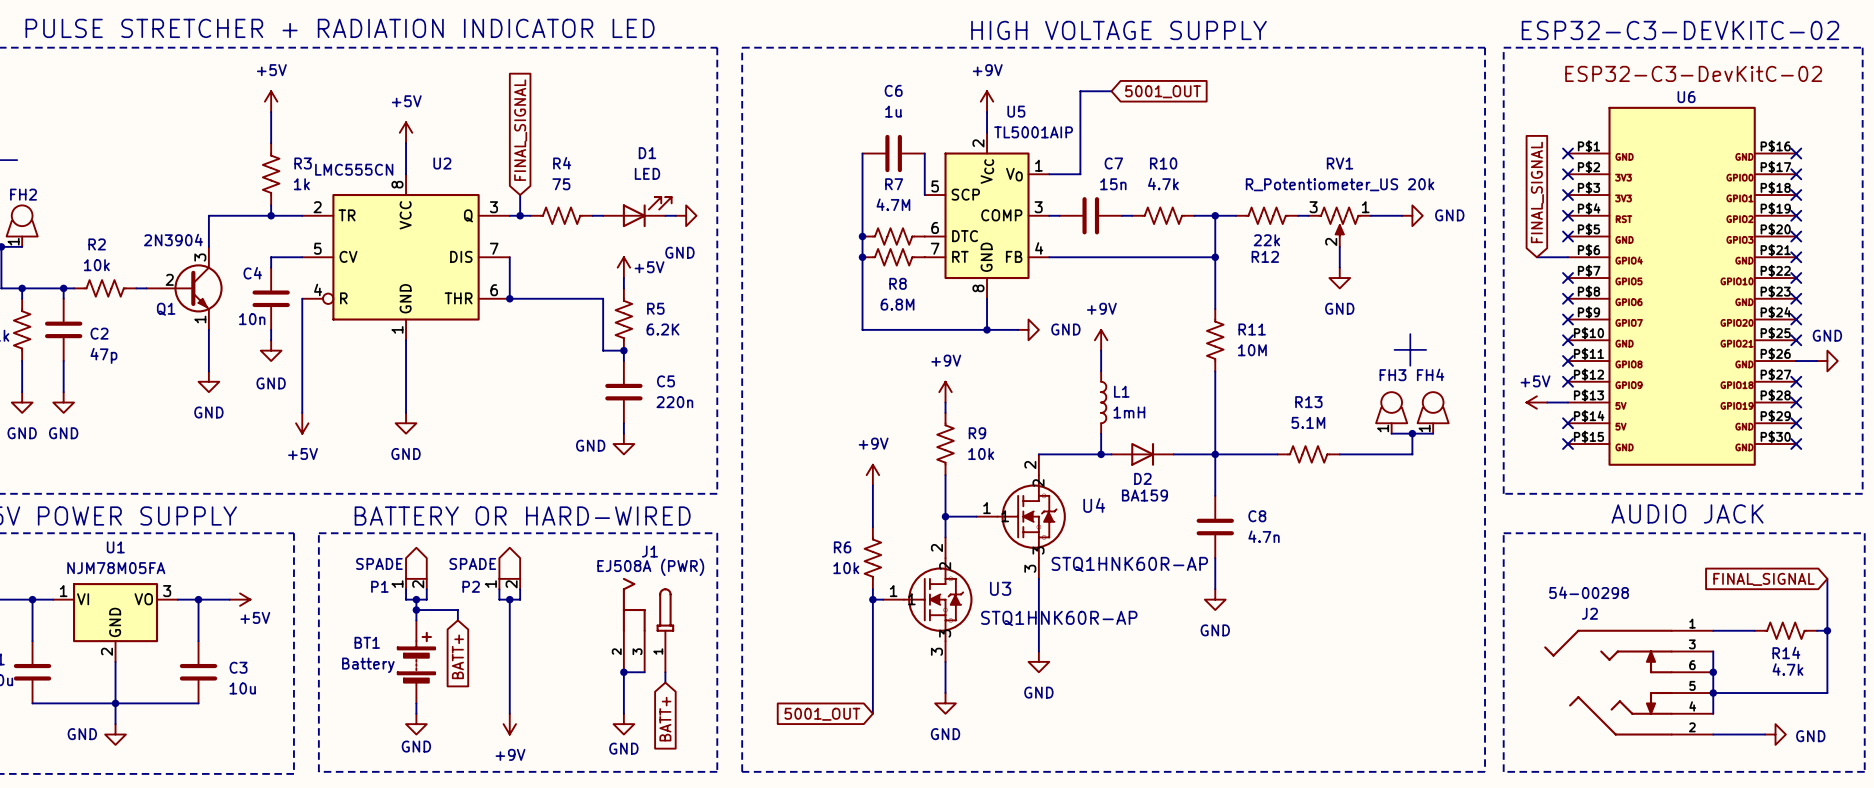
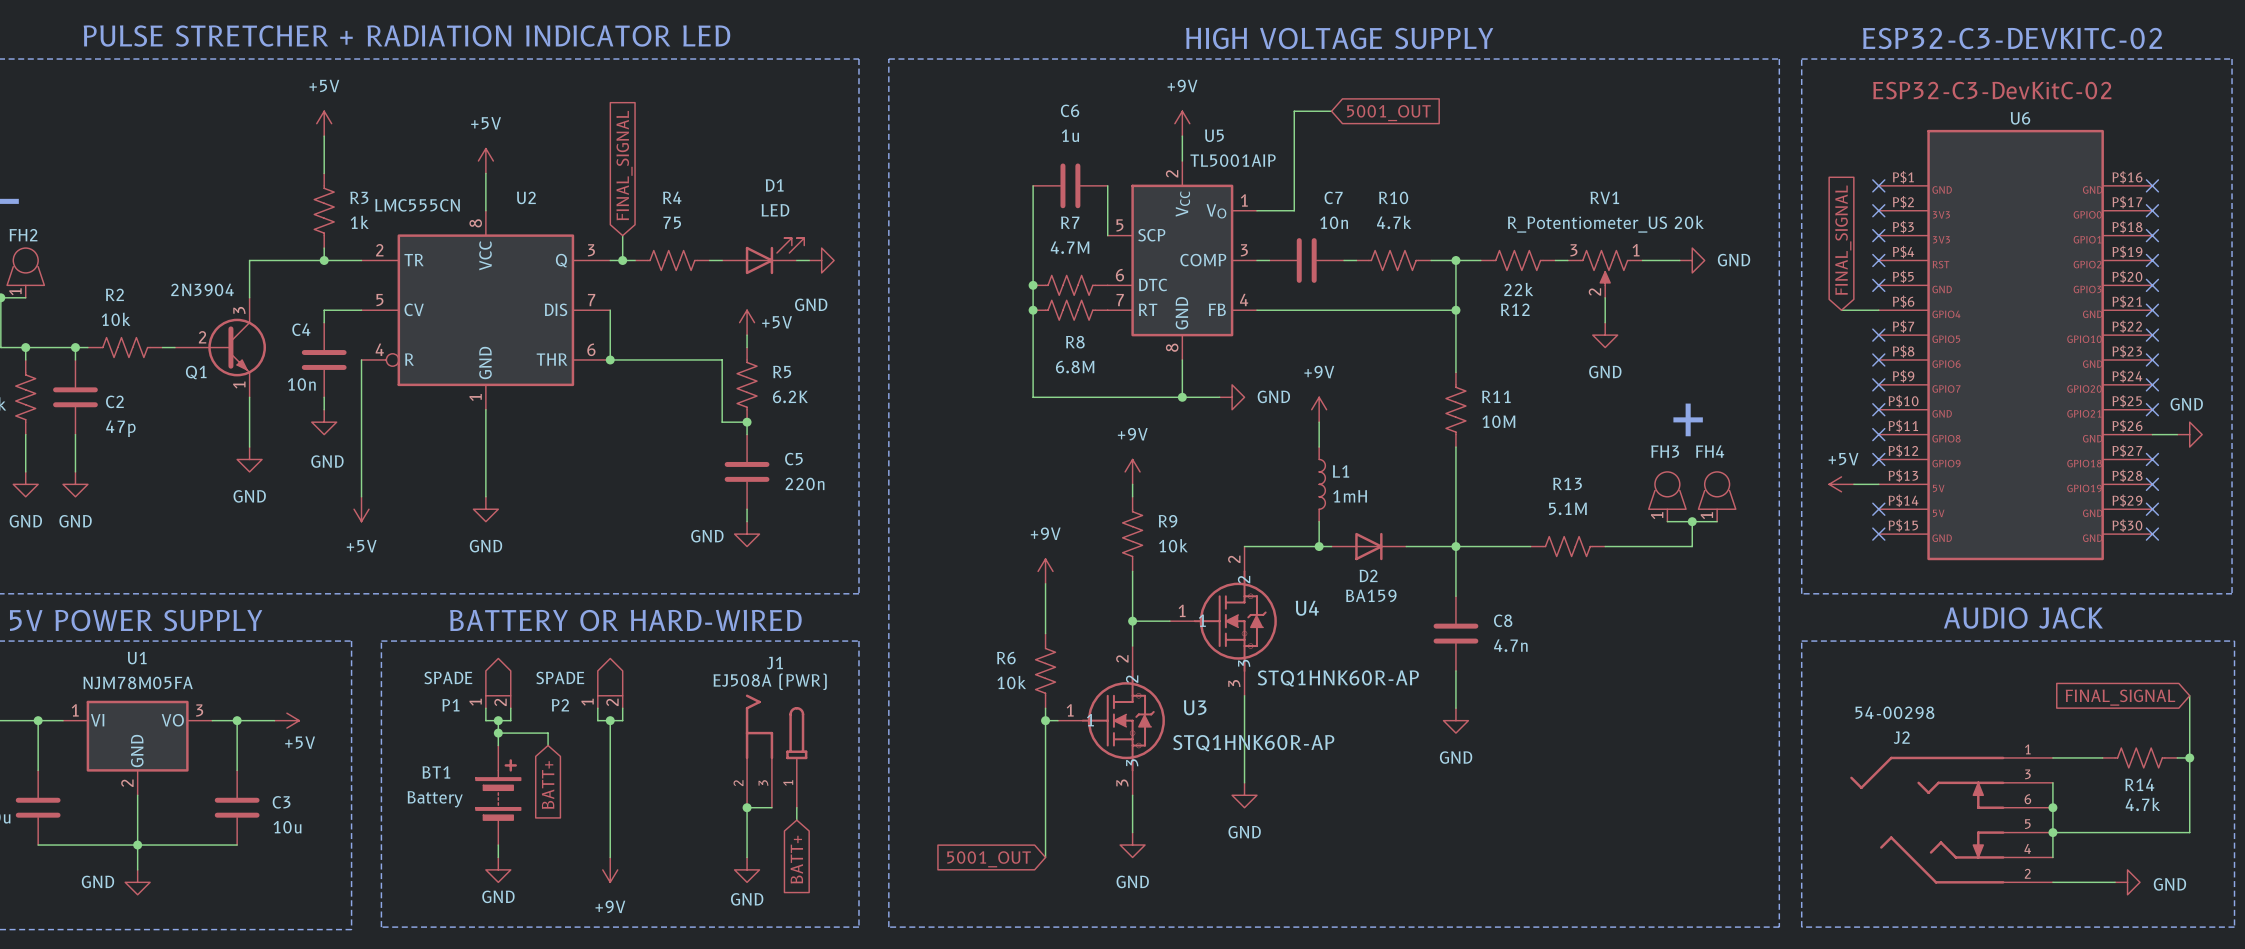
C7 value: 15n (1113, 184) -> 10n (1334, 222)

